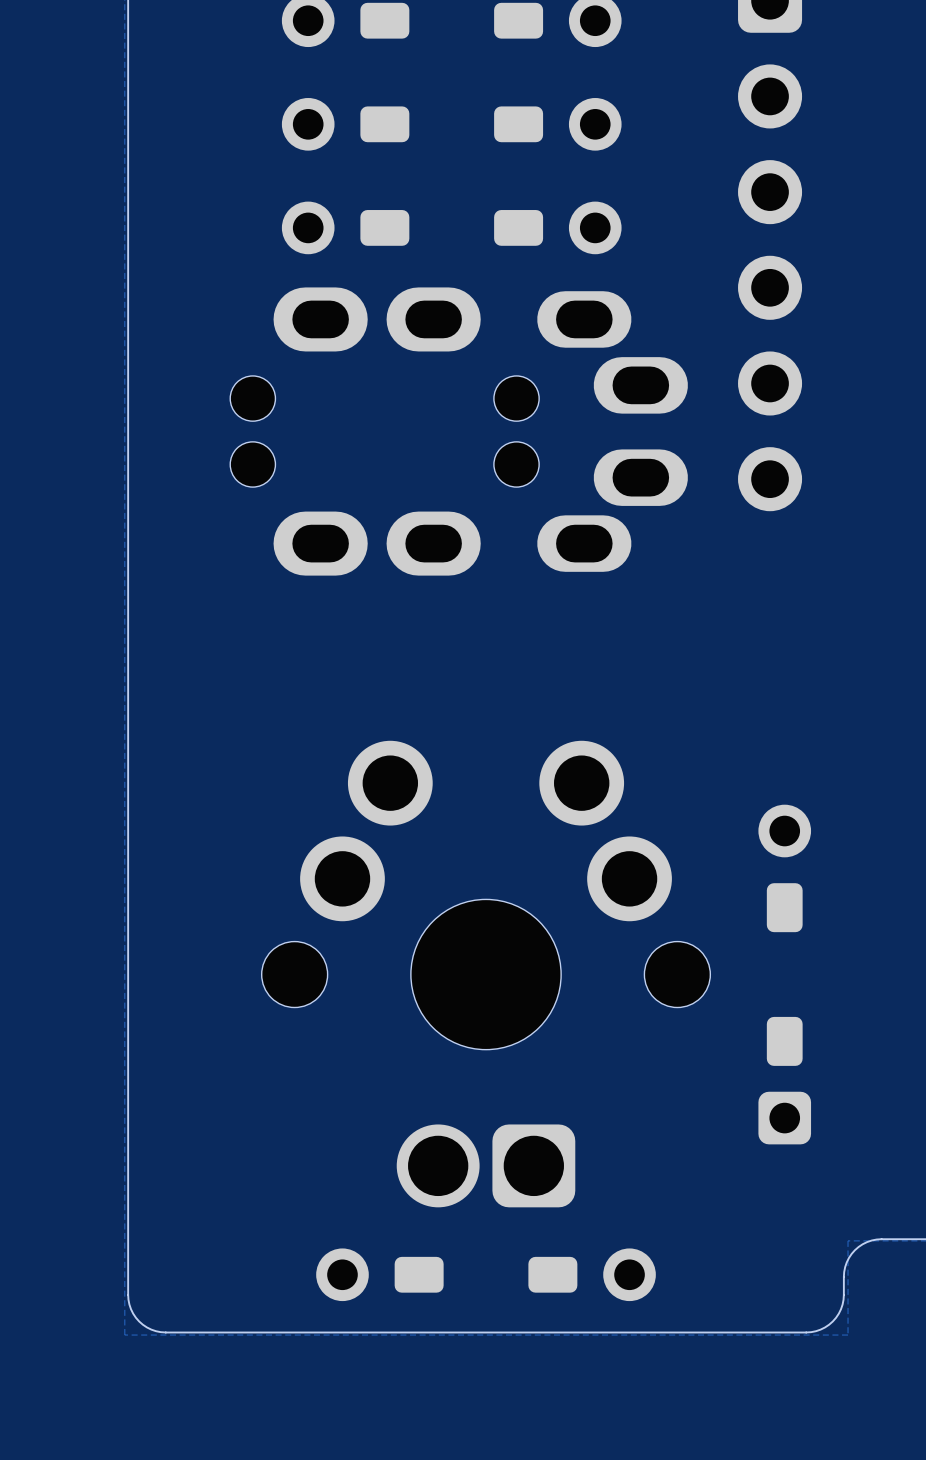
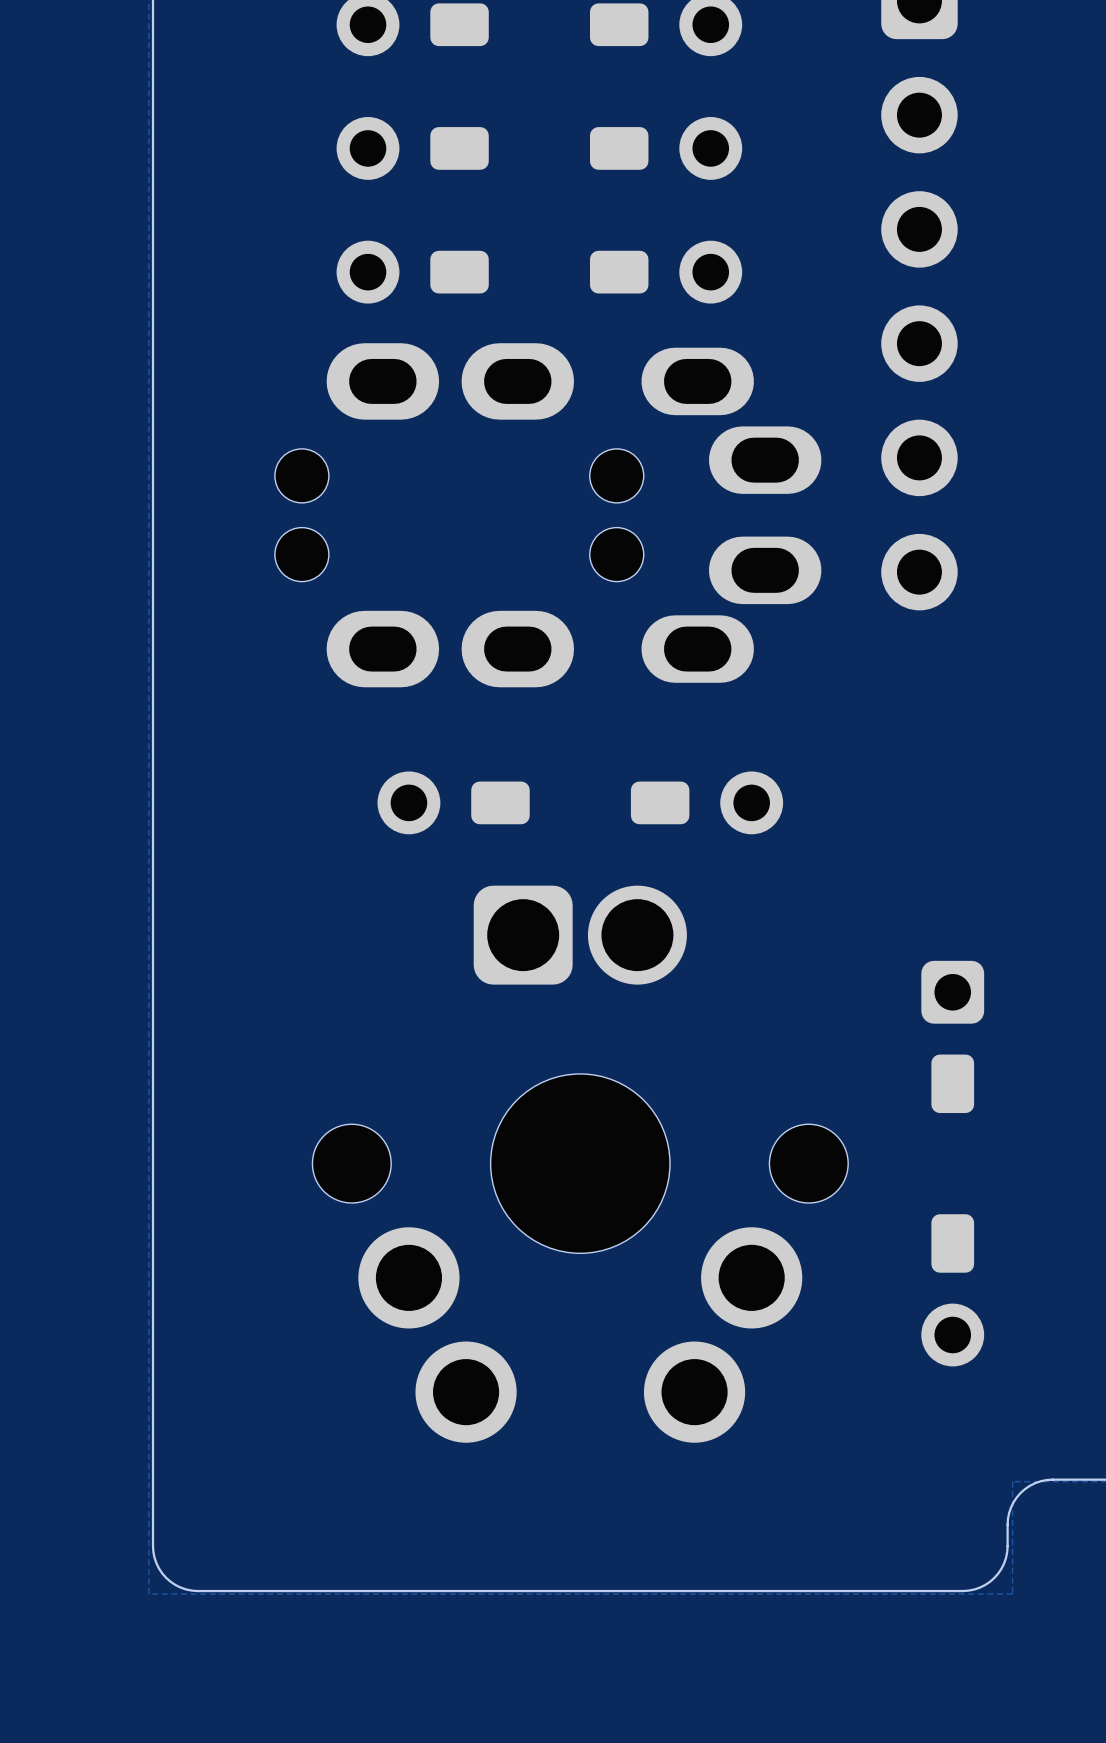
part rotation: 0° (486, 895) -> 180° (580, 1258)
part rotation: 0° (784, 974) -> 180° (952, 1163)
part rotation: 0° (486, 1165) -> 180° (580, 935)
part position: (486, 1165) -> (580, 935)
part position: (486, 1274) -> (580, 802)

